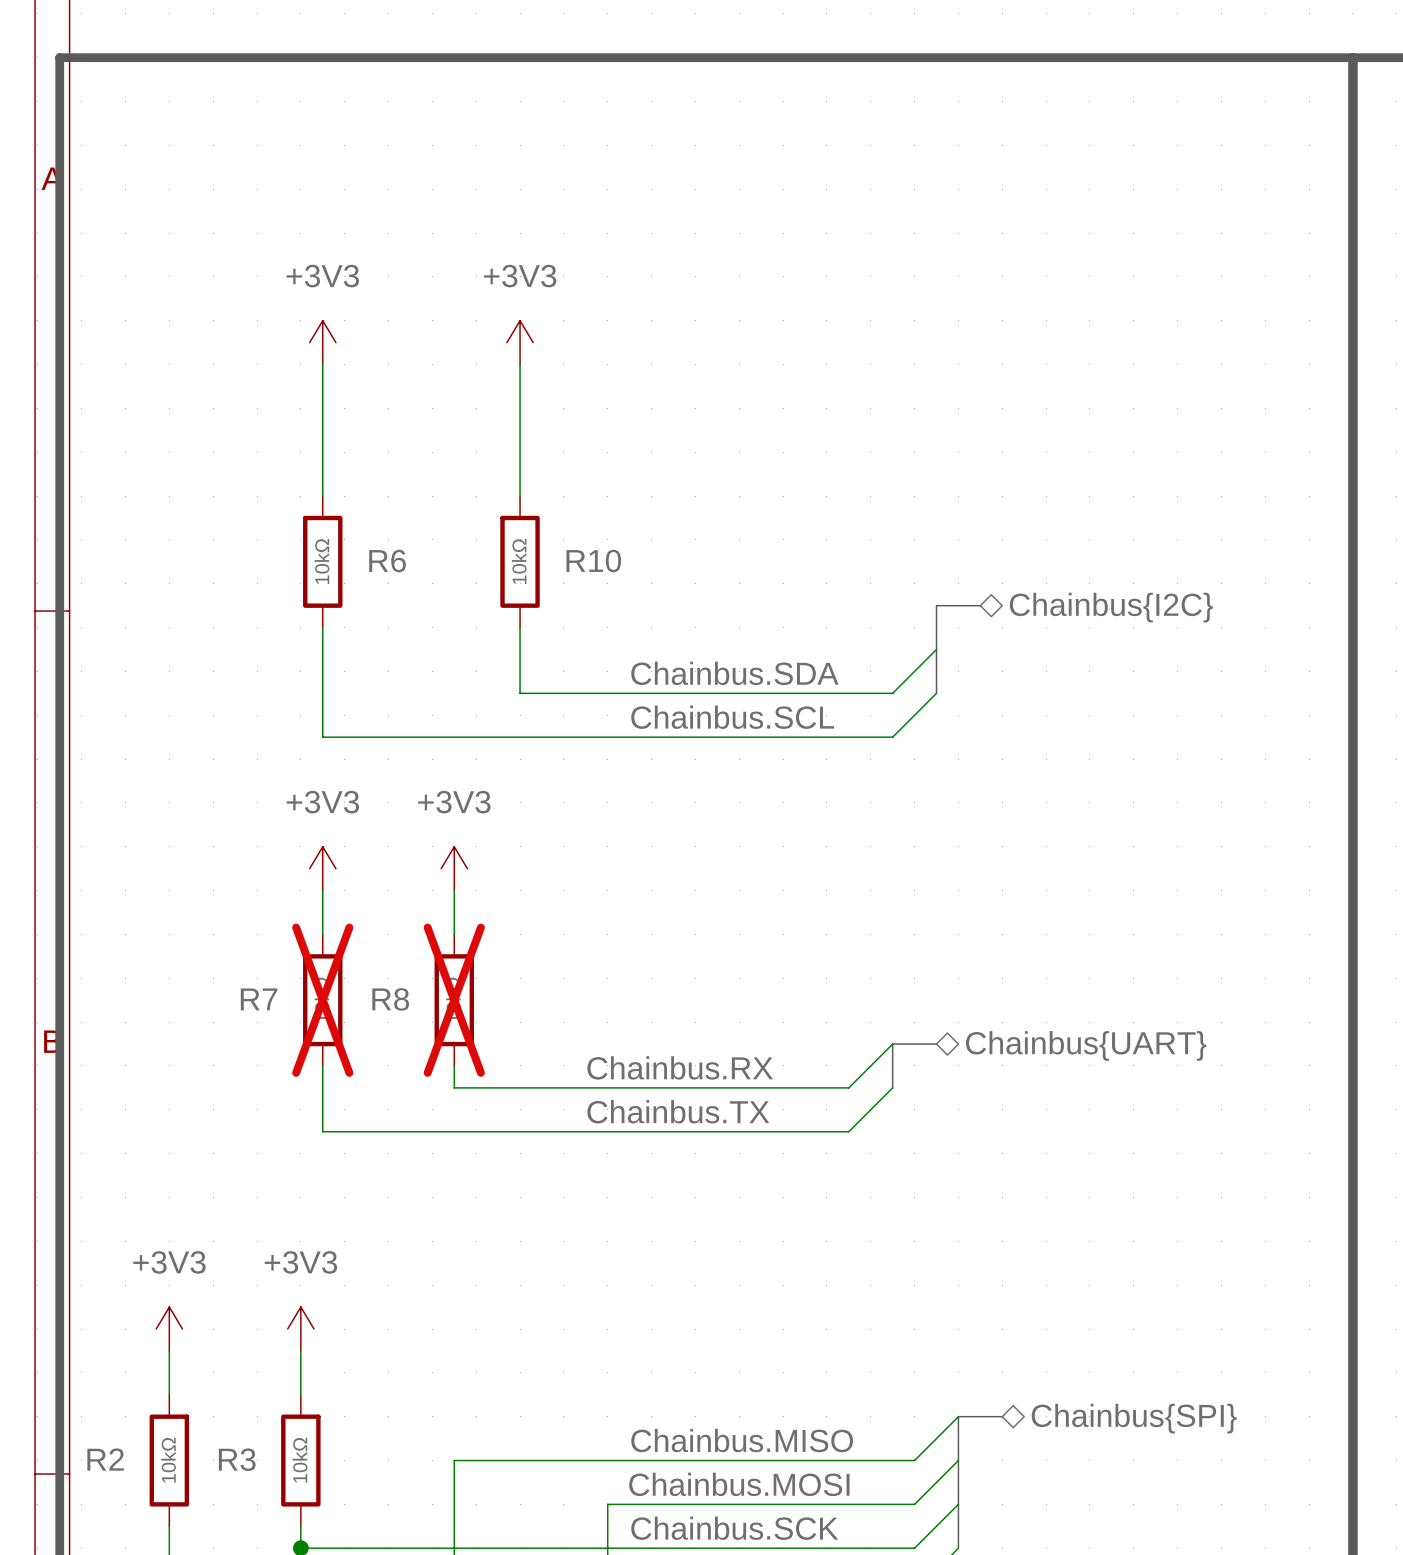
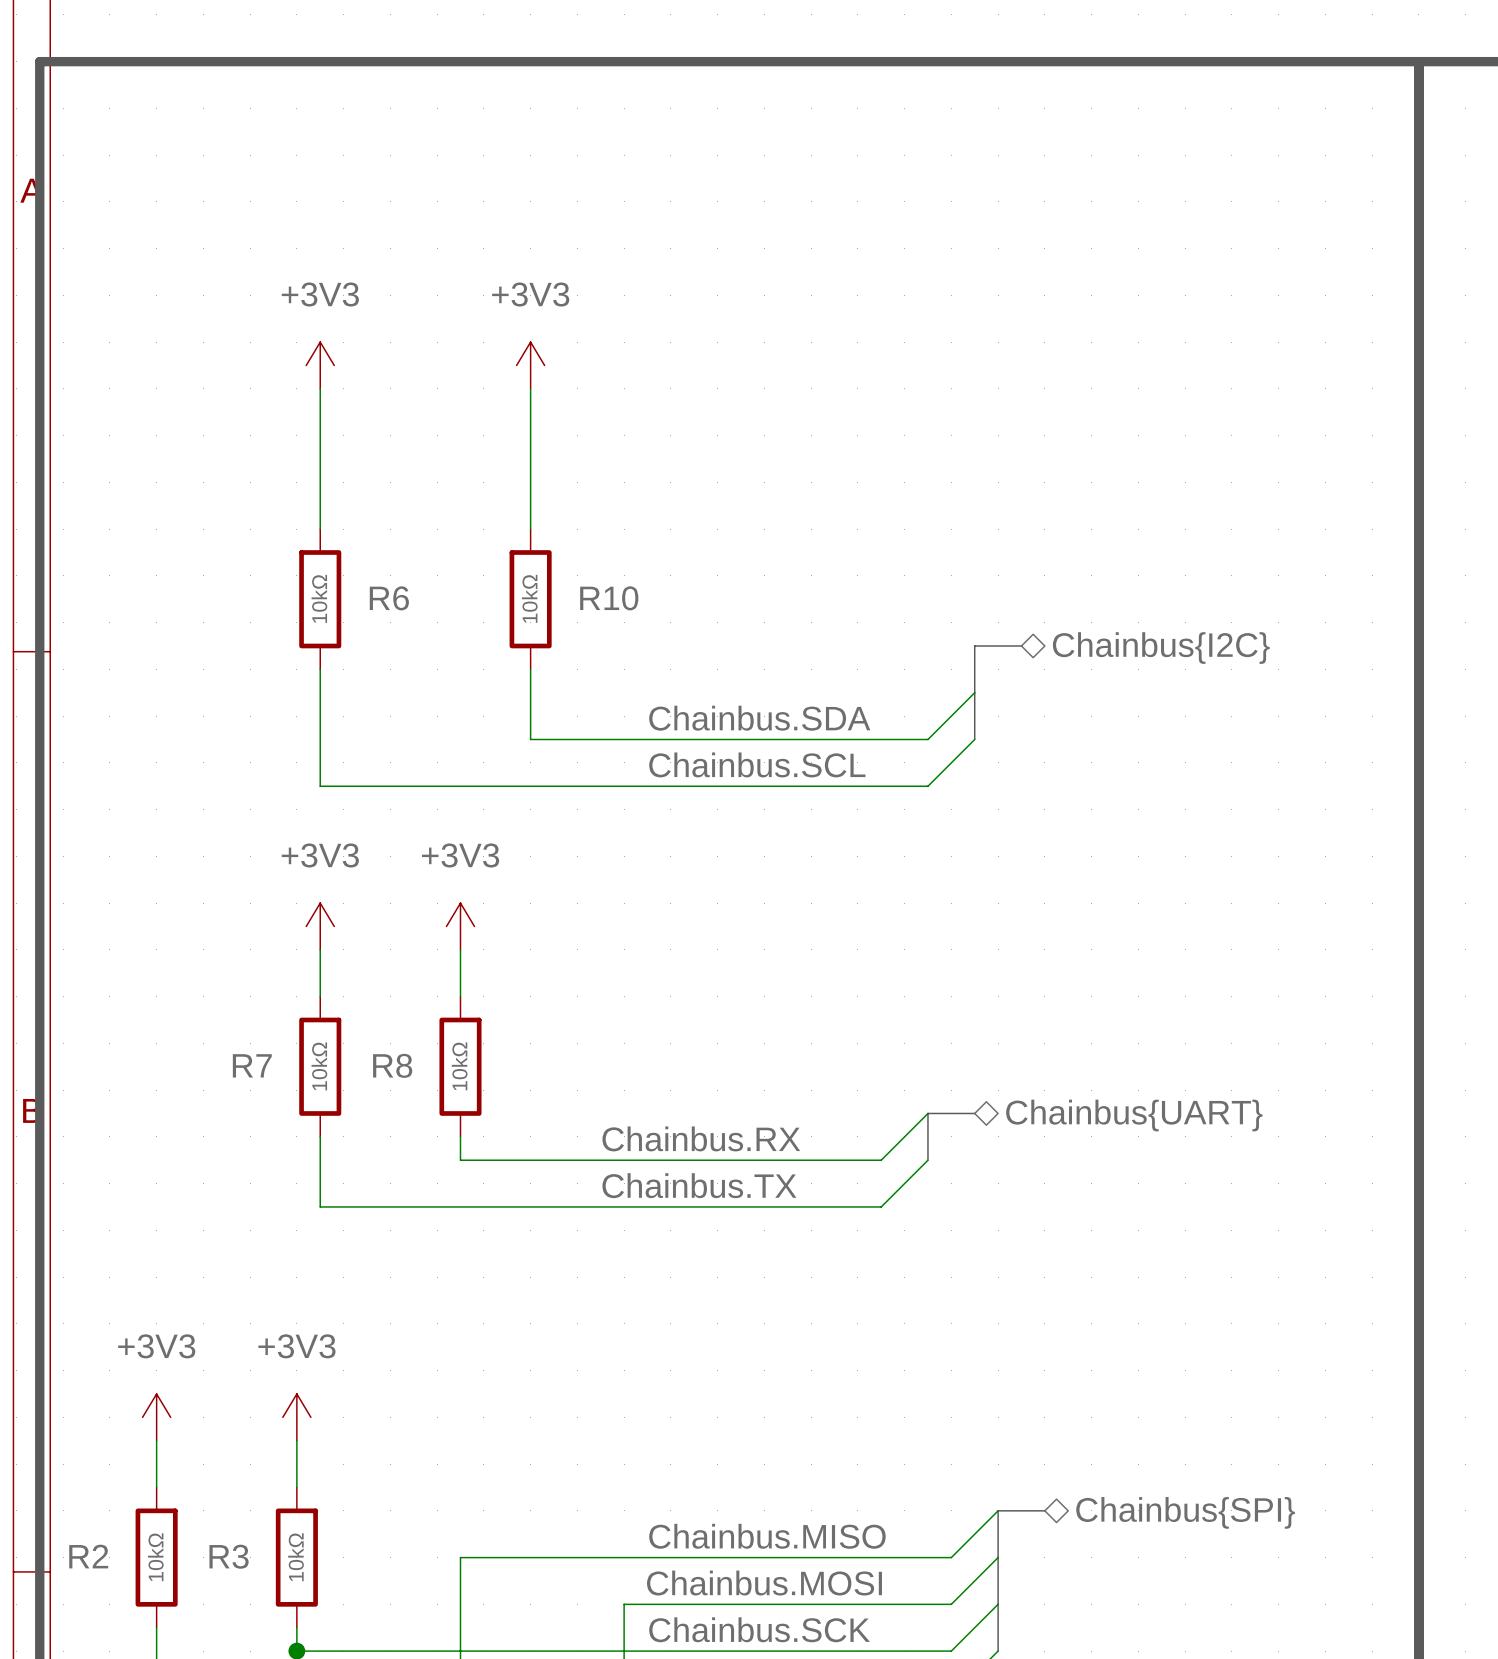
R7 do-not-place cross: (322, 1000) -> none
R8 do-not-place cross: (454, 1000) -> none

